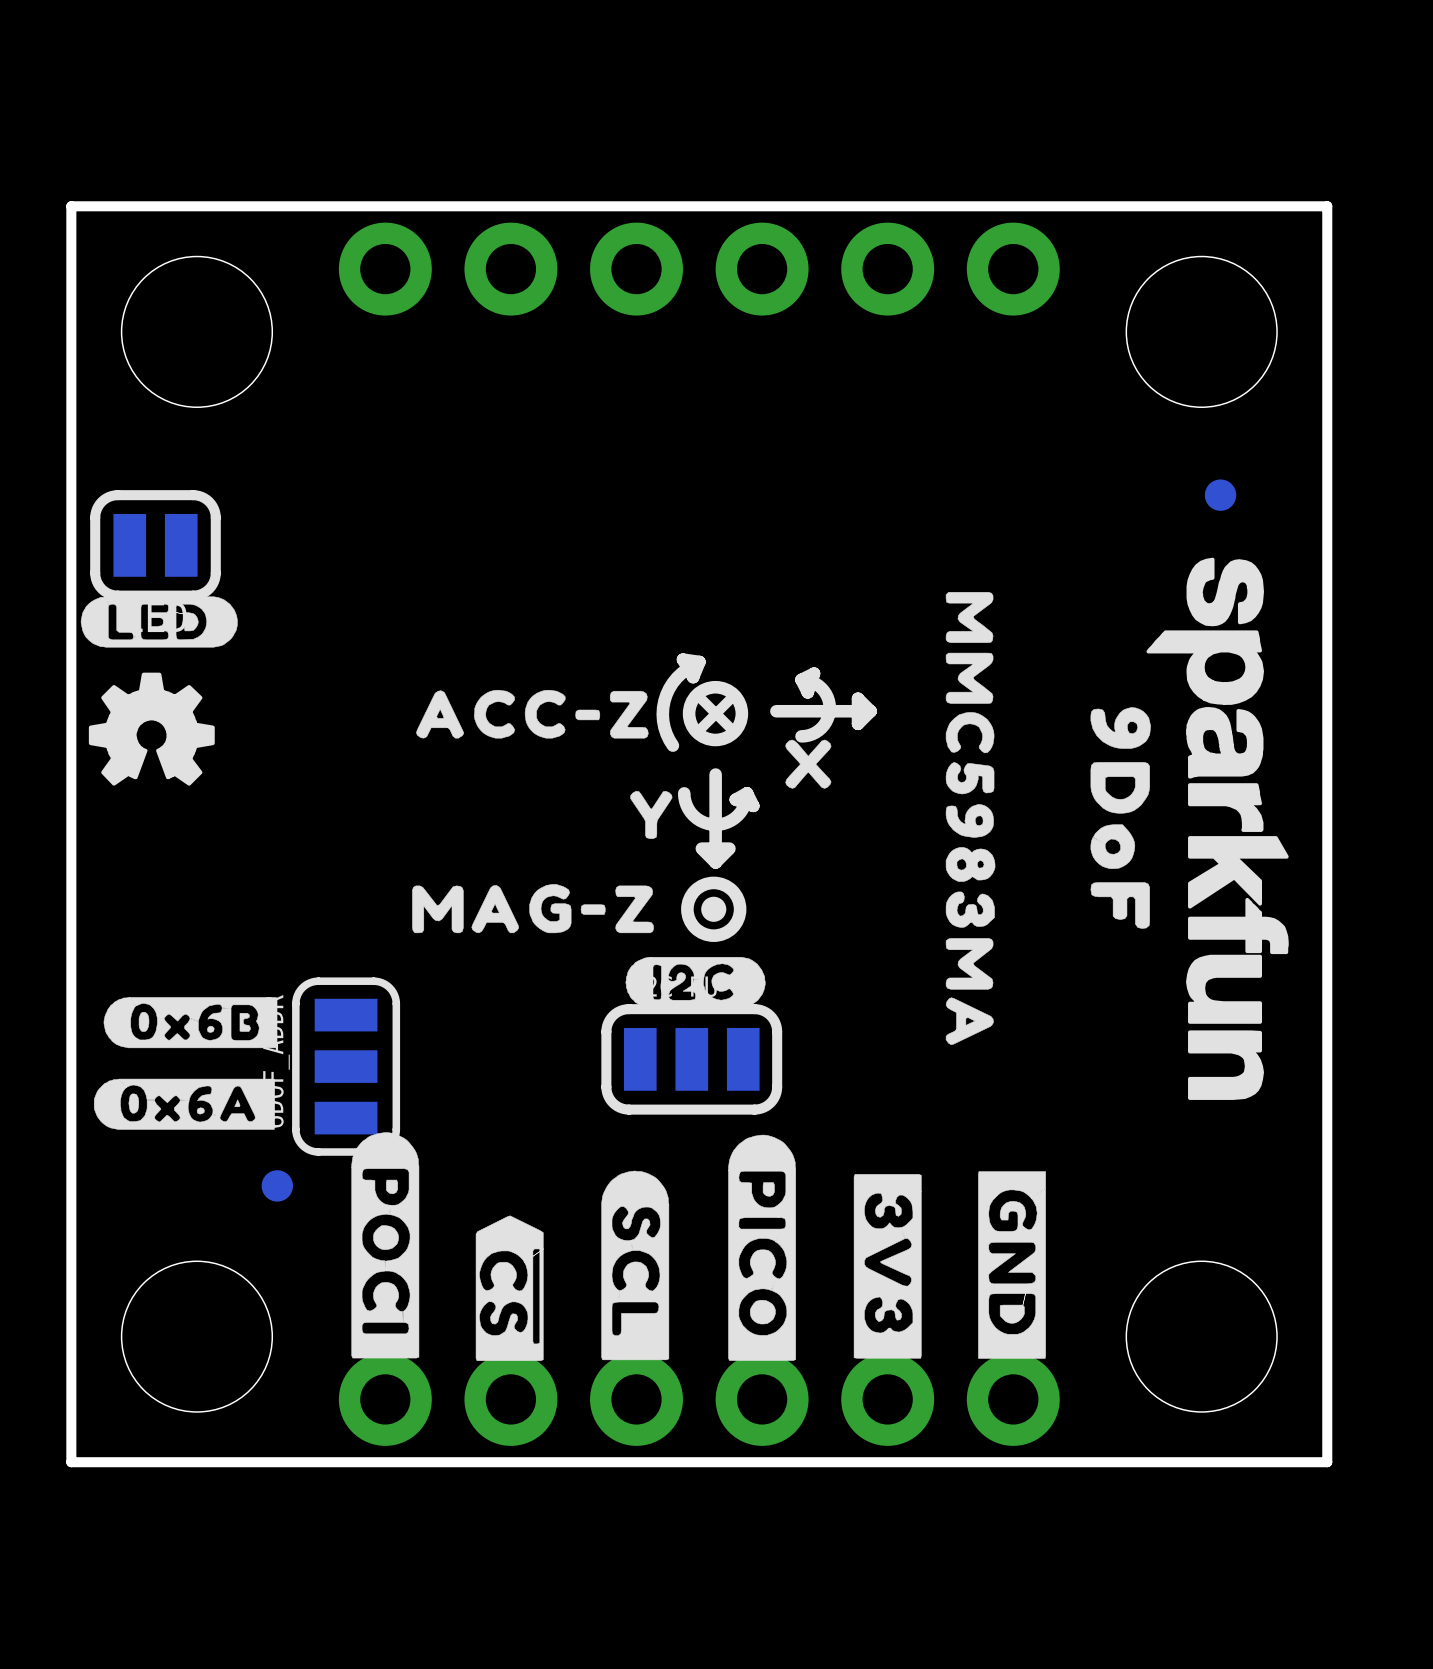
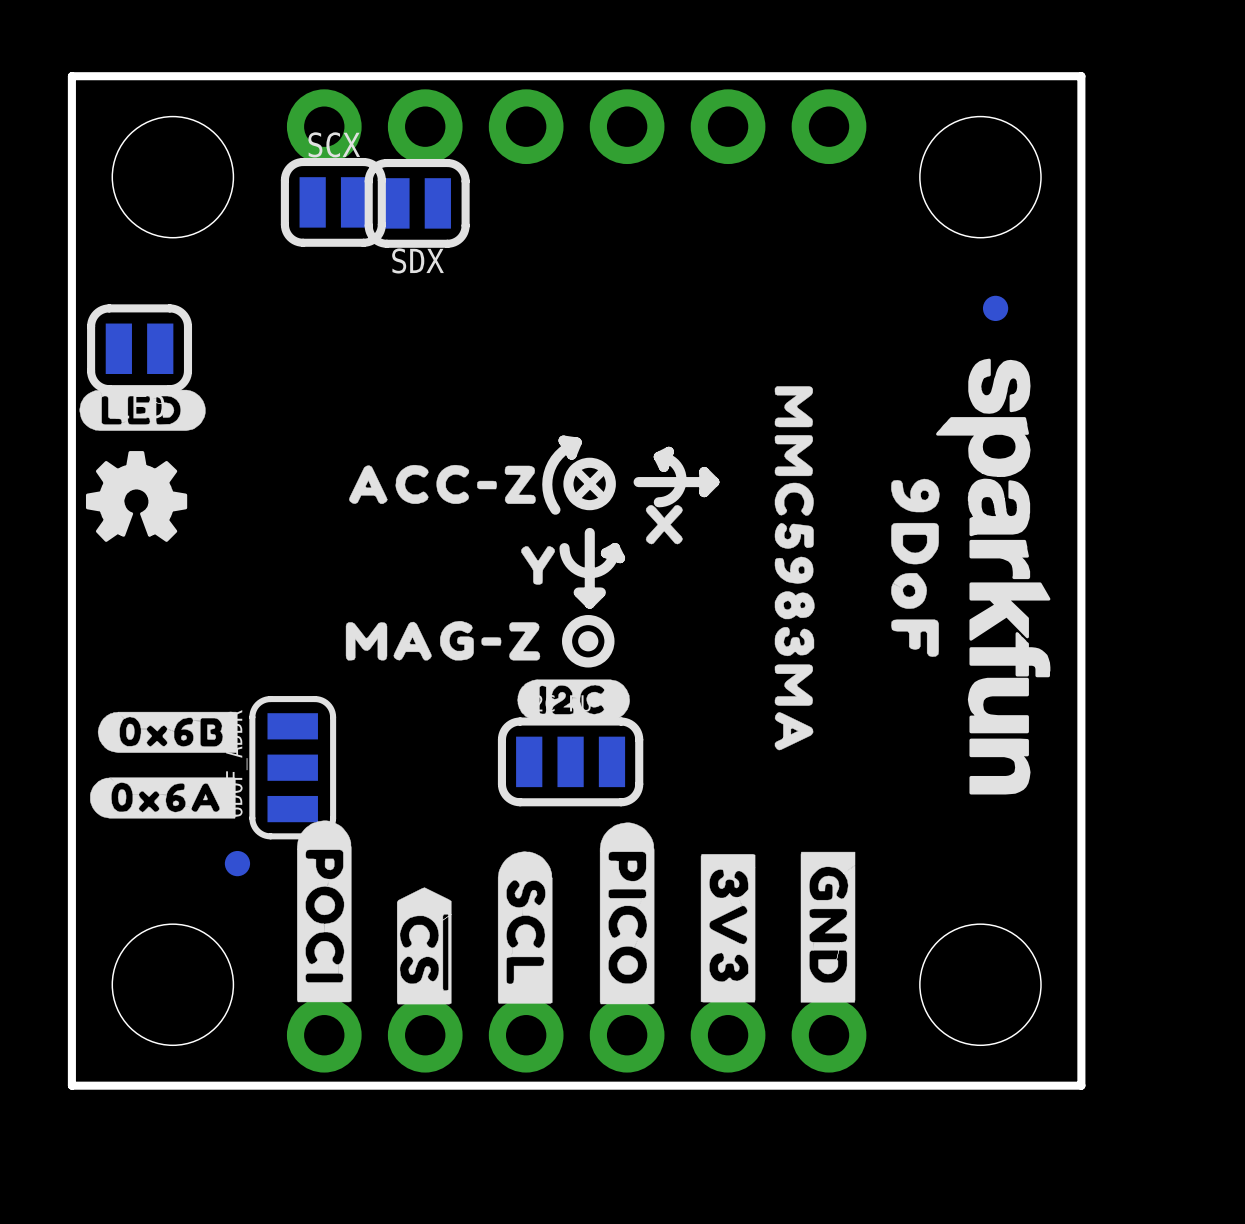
SCX: none -> (333, 202)
SDX: none -> (417, 203)

